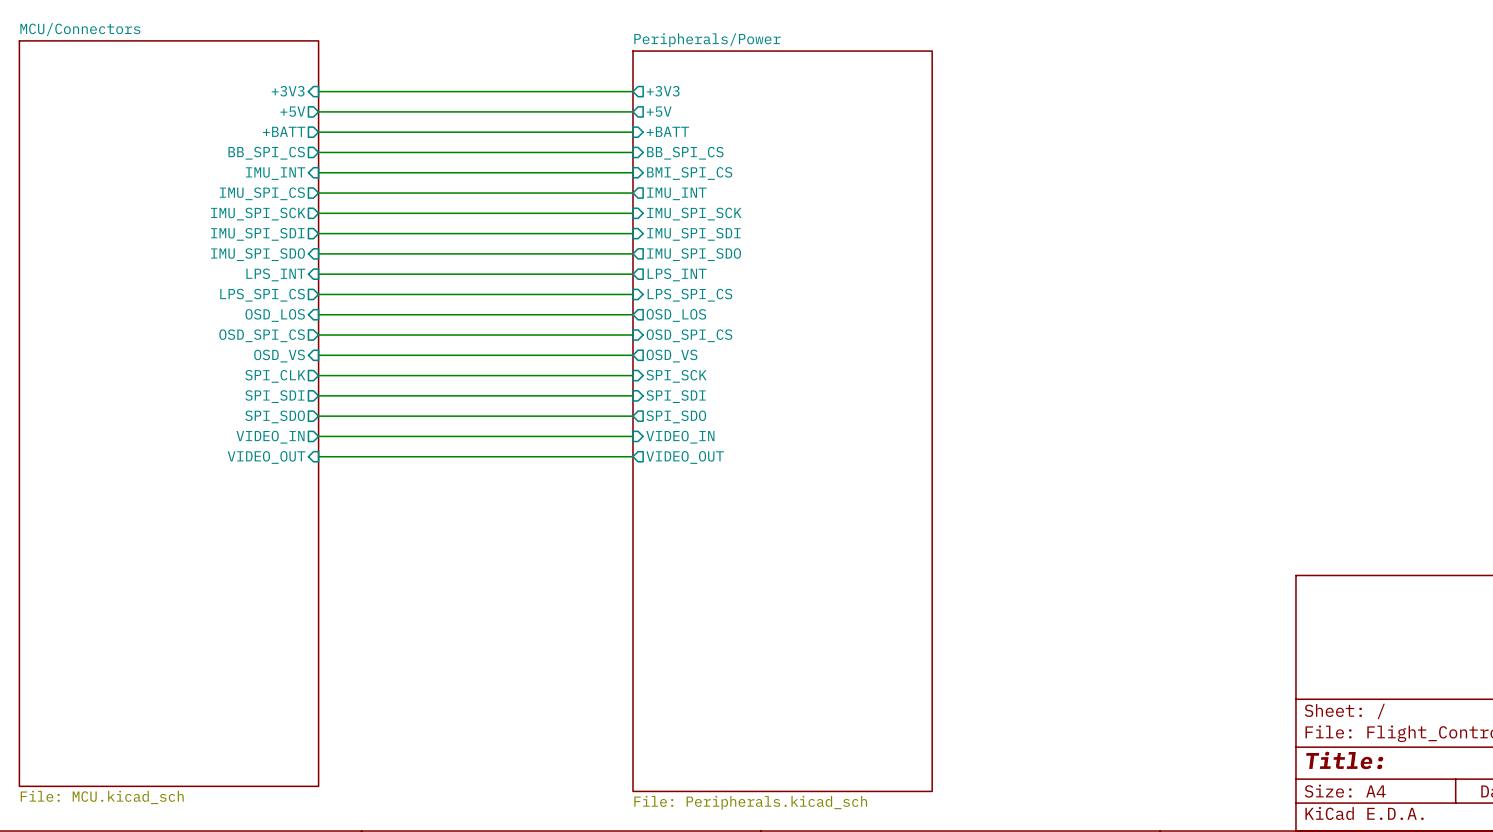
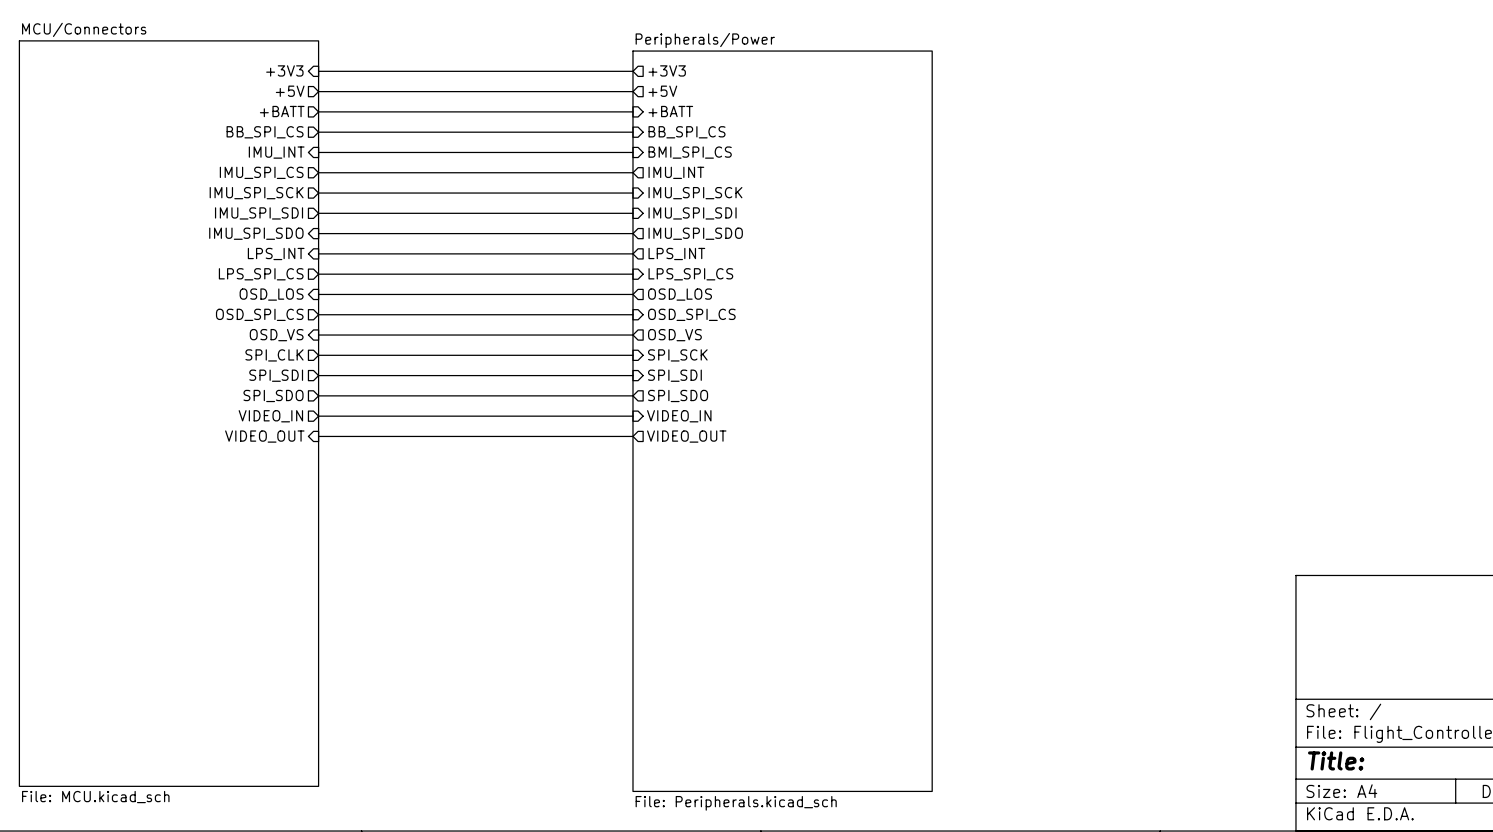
sheet pin: none -> +3V3 (284, 70)
sheet pin: none -> +3V3 (667, 70)
wire: none -> (318, 71) (632, 71)
sheet pin shape: input (288, 91) -> output (290, 91)
sheet pin: +3V3 (288, 91) -> +5V (290, 91)
sheet pin: +3V3 (663, 91) -> +5V (662, 91)
sheet pin: +5V (292, 111) -> +BATT (282, 111)
sheet pin shape: output (659, 111) -> input (670, 111)
sheet pin: +5V (659, 111) -> +BATT (670, 111)
sheet pin: +BATT (284, 131) -> BB_SPI_CS (265, 132)
sheet pin: +BATT (667, 131) -> BB_SPI_CS (687, 132)
sheet pin shape: output (266, 153) -> input (276, 152)
sheet pin: BB_SPI_CS (266, 153) -> IMU_INT (276, 152)
sheet pin: BB_SPI_CS (685, 153) -> BMI_SPI_CS (690, 152)
sheet pin shape: input (275, 173) -> output (261, 172)
sheet pin: IMU_INT (275, 173) -> IMU_SPI_CS (261, 172)
sheet pin shape: input (689, 173) -> output (676, 172)
sheet pin: BMI_SPI_CS (689, 173) -> IMU_INT (676, 172)
sheet pin: IMU_SPI_CS (262, 193) -> IMU_SPI_SCK (256, 193)
sheet pin shape: output (676, 193) -> input (695, 193)
sheet pin: IMU_INT (676, 193) -> IMU_SPI_SCK (695, 193)
sheet pin: IMU_SPI_SCK (258, 214) -> IMU_SPI_SDI (259, 213)
sheet pin: IMU_SPI_SCK (694, 214) -> IMU_SPI_SDI (692, 213)
sheet pin shape: output (257, 234) -> input (256, 233)
sheet pin: IMU_SPI_SDI (257, 234) -> IMU_SPI_SDO (256, 233)
sheet pin shape: input (693, 234) -> output (695, 233)
sheet pin: IMU_SPI_SDI (693, 234) -> IMU_SPI_SDO (695, 233)
sheet pin: IMU_SPI_SDO (257, 254) -> LPS_INT (276, 253)
sheet pin: IMU_SPI_SDO (694, 254) -> LPS_INT (676, 253)
sheet pin shape: input (275, 274) -> output (261, 274)
sheet pin: LPS_INT (275, 274) -> LPS_SPI_CS (261, 274)
sheet pin shape: output (677, 274) -> input (690, 274)
sheet pin: LPS_INT (677, 274) -> LPS_SPI_CS (690, 274)
sheet pin shape: output (262, 295) -> input (271, 294)
sheet pin: LPS_SPI_CS (262, 295) -> OSD_LOS (271, 294)
sheet pin shape: input (689, 295) -> output (680, 294)
sheet pin: LPS_SPI_CS (689, 295) -> OSD_LOS (680, 294)
sheet pin shape: input (275, 315) -> output (259, 314)
sheet pin: OSD_LOS (275, 315) -> OSD_SPI_CS (259, 314)
sheet pin shape: output (676, 315) -> input (691, 314)
sheet pin: OSD_LOS (676, 315) -> OSD_SPI_CS (691, 314)
sheet pin shape: output (262, 335) -> input (276, 335)
sheet pin: OSD_SPI_CS (262, 335) -> OSD_VS (276, 335)
sheet pin shape: input (689, 335) -> output (674, 335)
sheet pin: OSD_SPI_CS (689, 335) -> OSD_VS (674, 335)
sheet pin shape: input (279, 356) -> output (274, 355)
sheet pin: OSD_VS (279, 356) -> SPI_CLK (274, 355)
sheet pin shape: output (672, 356) -> input (677, 355)
sheet pin: OSD_VS (672, 356) -> SPI_SCK (677, 355)
sheet pin: SPI_CLK (275, 376) -> SPI_SDI (276, 375)
sheet pin: SPI_SCK (676, 376) -> SPI_SDI (674, 375)
sheet pin: SPI_SDI (274, 396) -> SPI_SDO (273, 395)
sheet pin shape: input (676, 396) -> output (678, 395)
sheet pin: SPI_SDI (676, 396) -> SPI_SDO (678, 395)
sheet pin: SPI_SDO (275, 416) -> VIDEO_IN (270, 416)
sheet pin shape: output (676, 416) -> input (679, 416)
sheet pin: SPI_SDO (676, 416) -> VIDEO_IN (679, 416)
sheet pin shape: output (270, 437) -> input (264, 436)
sheet pin: VIDEO_IN (270, 437) -> VIDEO_OUT (264, 436)
sheet pin shape: input (680, 437) -> output (686, 436)
sheet pin: VIDEO_IN (680, 437) -> VIDEO_OUT (686, 436)
wire: (318, 456) (632, 456) -> none
sheet pin: VIDEO_OUT (266, 457) -> none
sheet pin: VIDEO_OUT (685, 457) -> none

